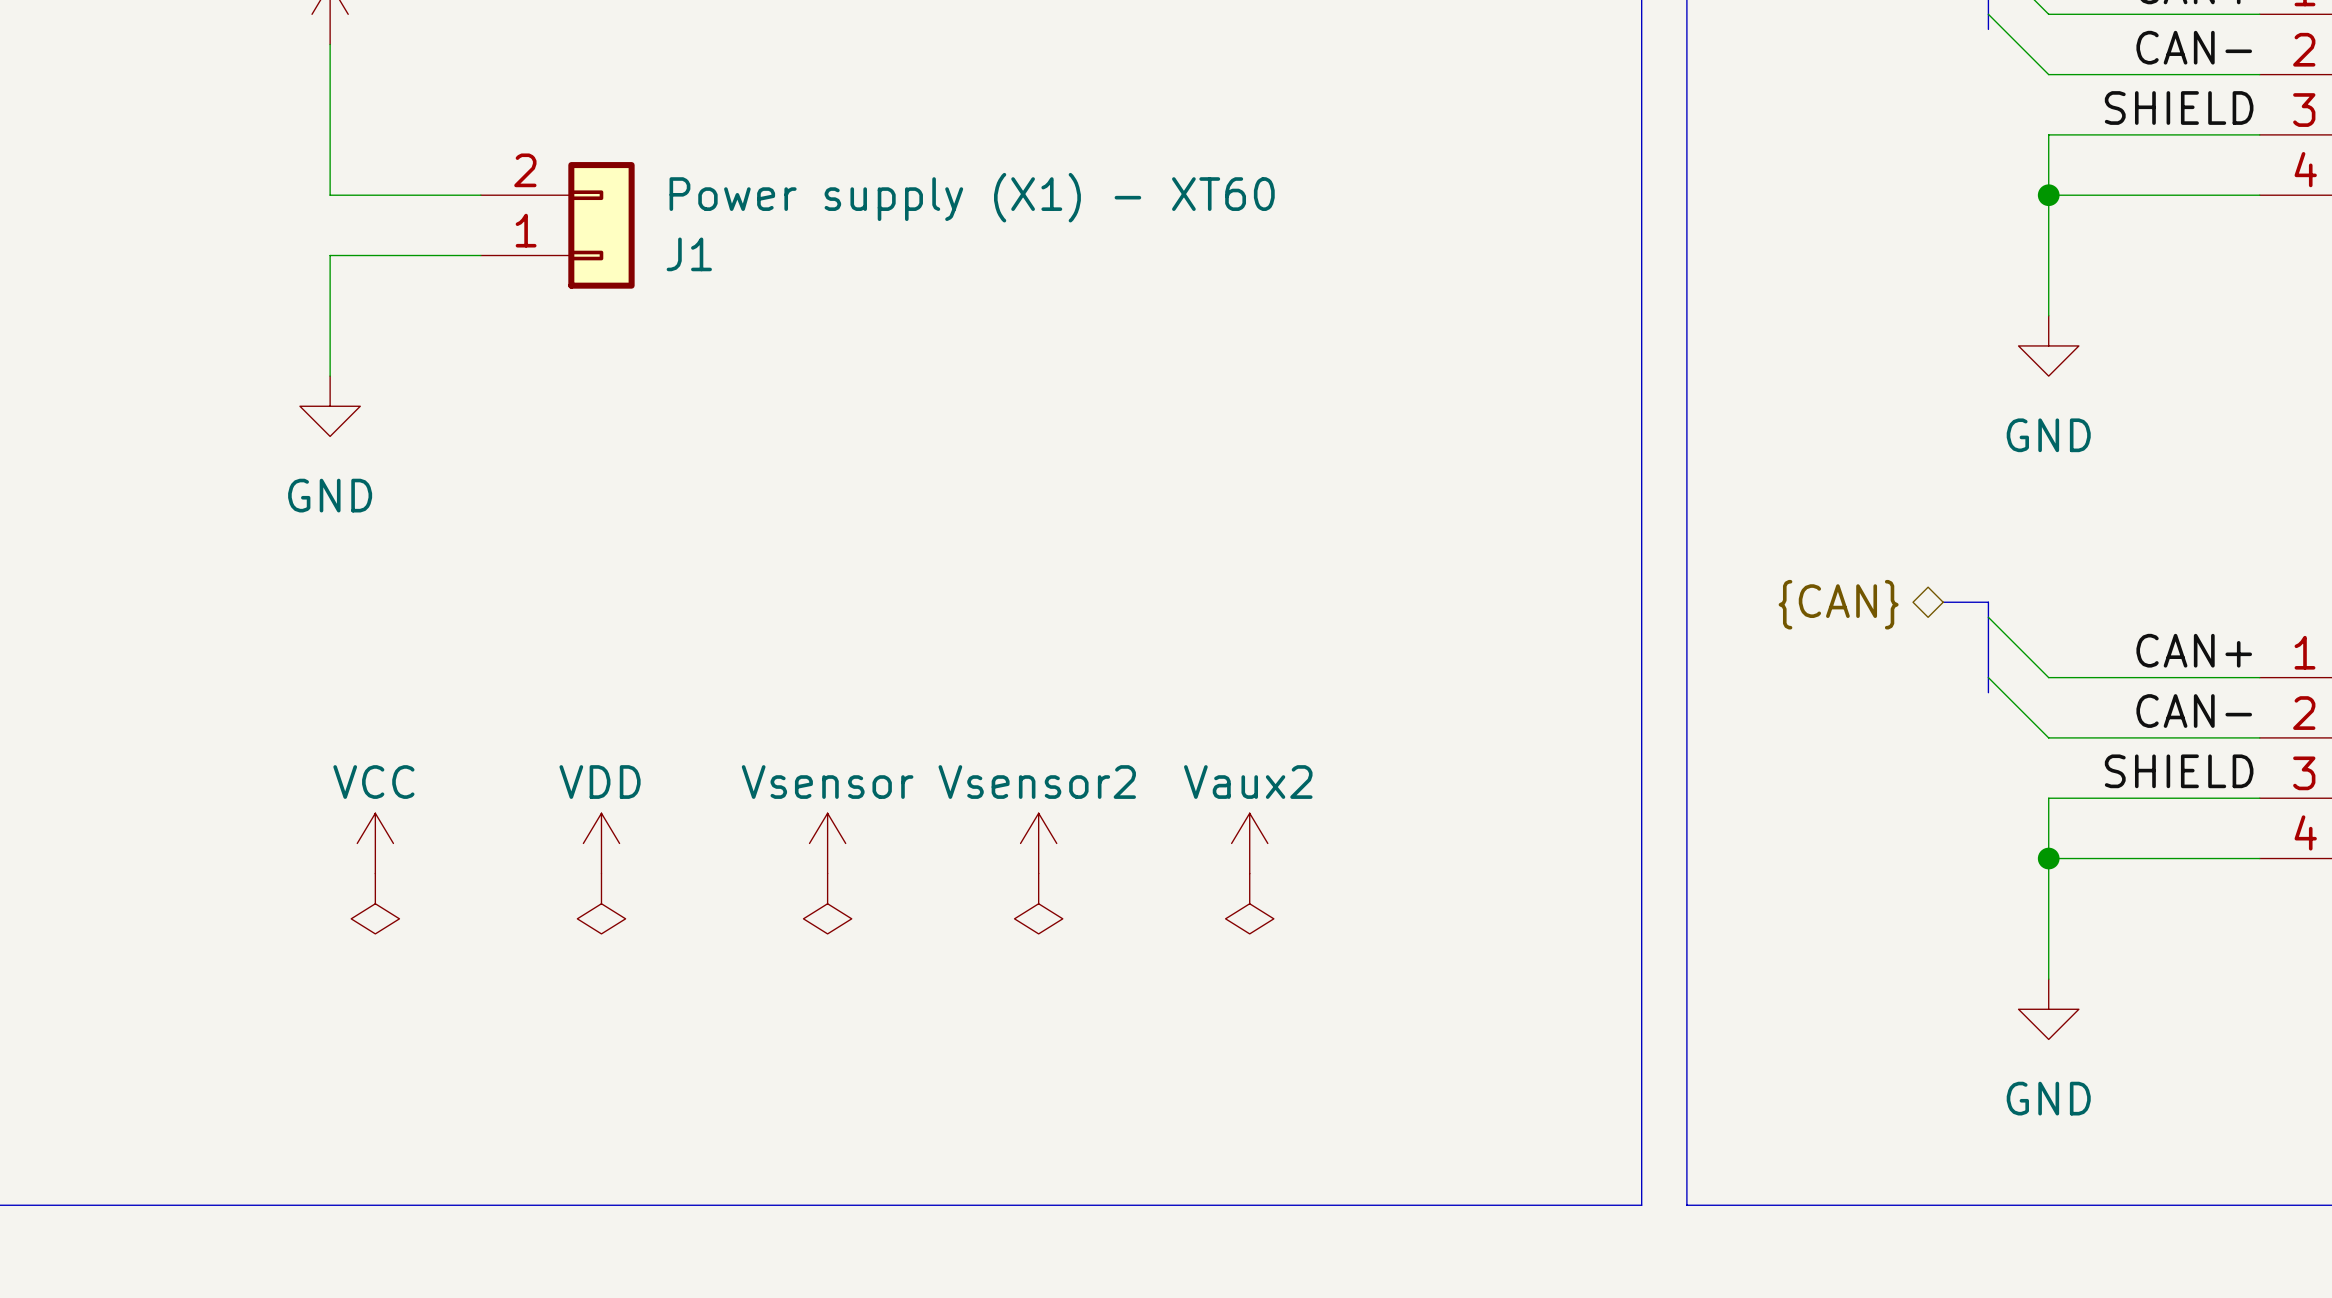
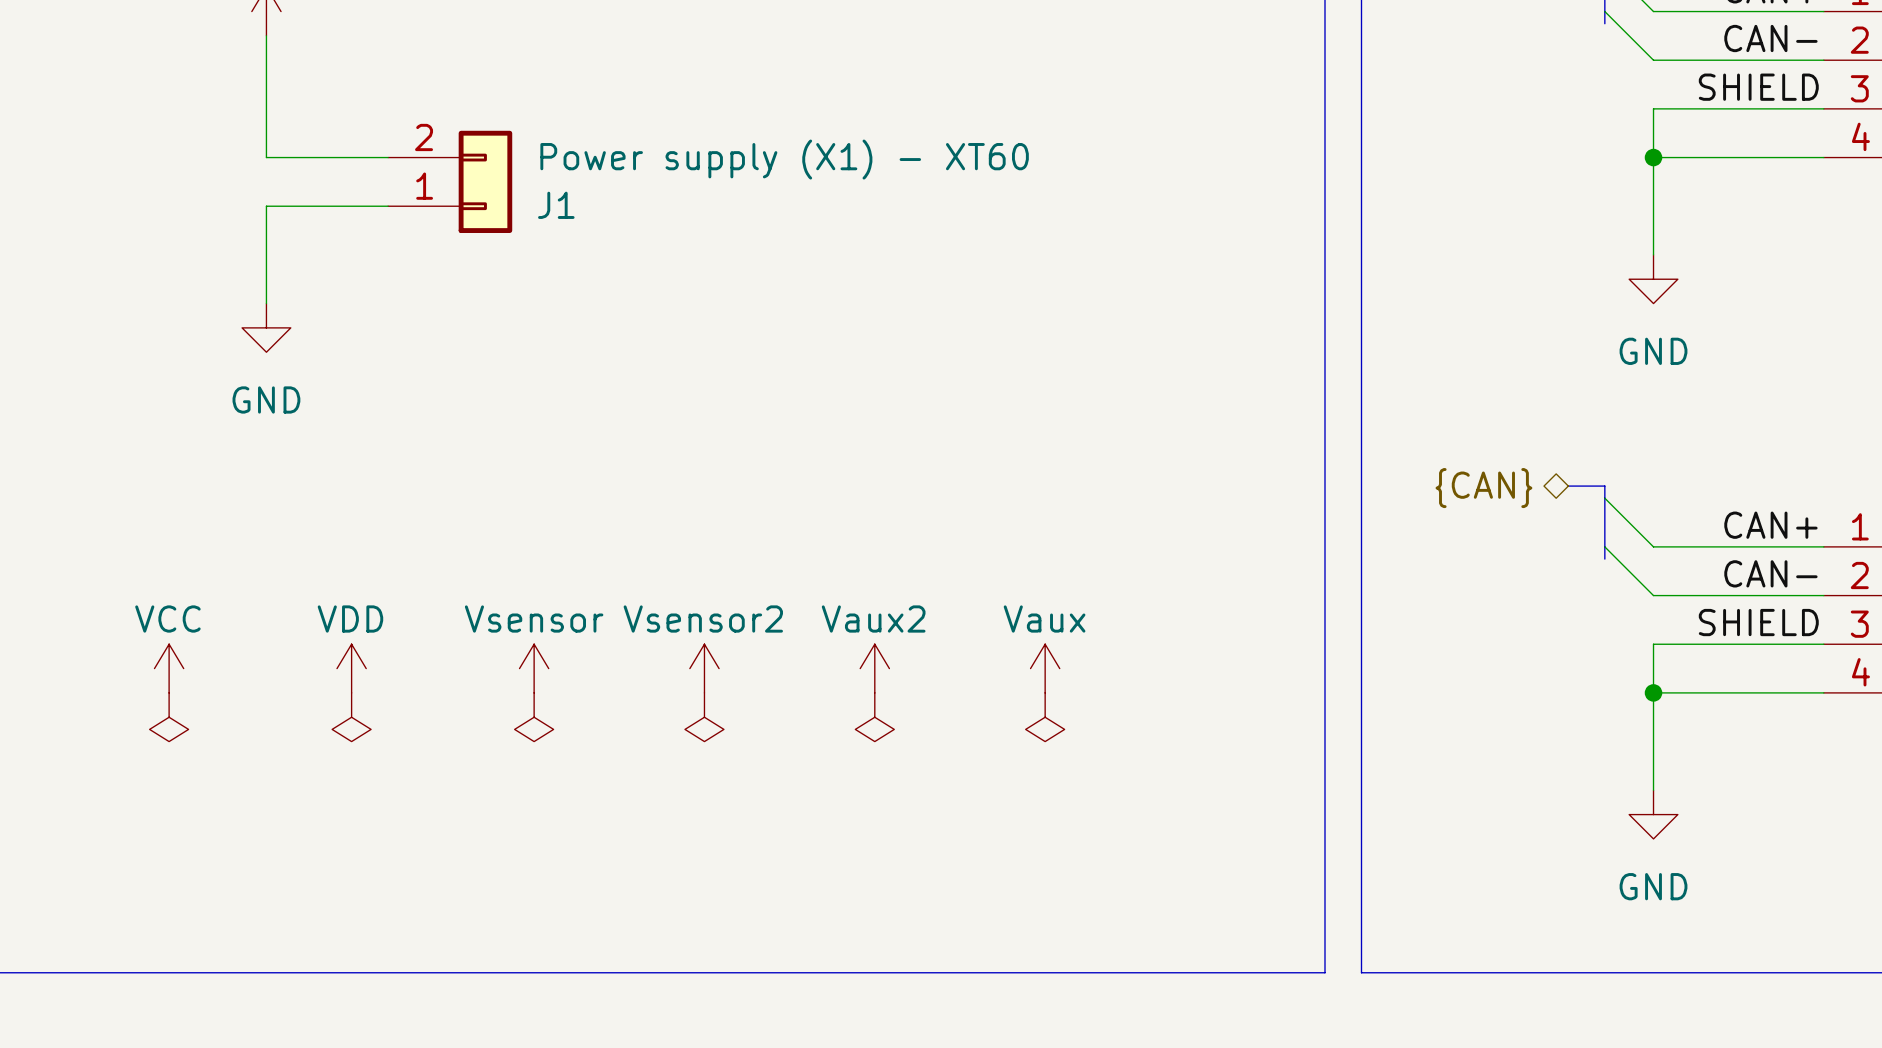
power symbol: none -> Vaux (1045, 668)
power symbol position: VCC (375, 843) -> VCC (169, 668)
power symbol position: VDD (601, 843) -> VDD (351, 668)
power symbol position: Vsensor (827, 843) -> Vsensor (534, 668)
power symbol position: Vsensor2 (1038, 843) -> Vsensor2 (704, 668)
power symbol position: Vaux2 (1249, 843) -> Vaux2 (874, 668)
power symbol: none -> (169, 717)
power symbol position: (375, 903) -> (351, 717)
power symbol position: (601, 903) -> (534, 717)
power symbol position: (827, 903) -> (704, 717)
power symbol position: (1038, 903) -> (874, 717)
power symbol position: (1249, 903) -> (1045, 717)

